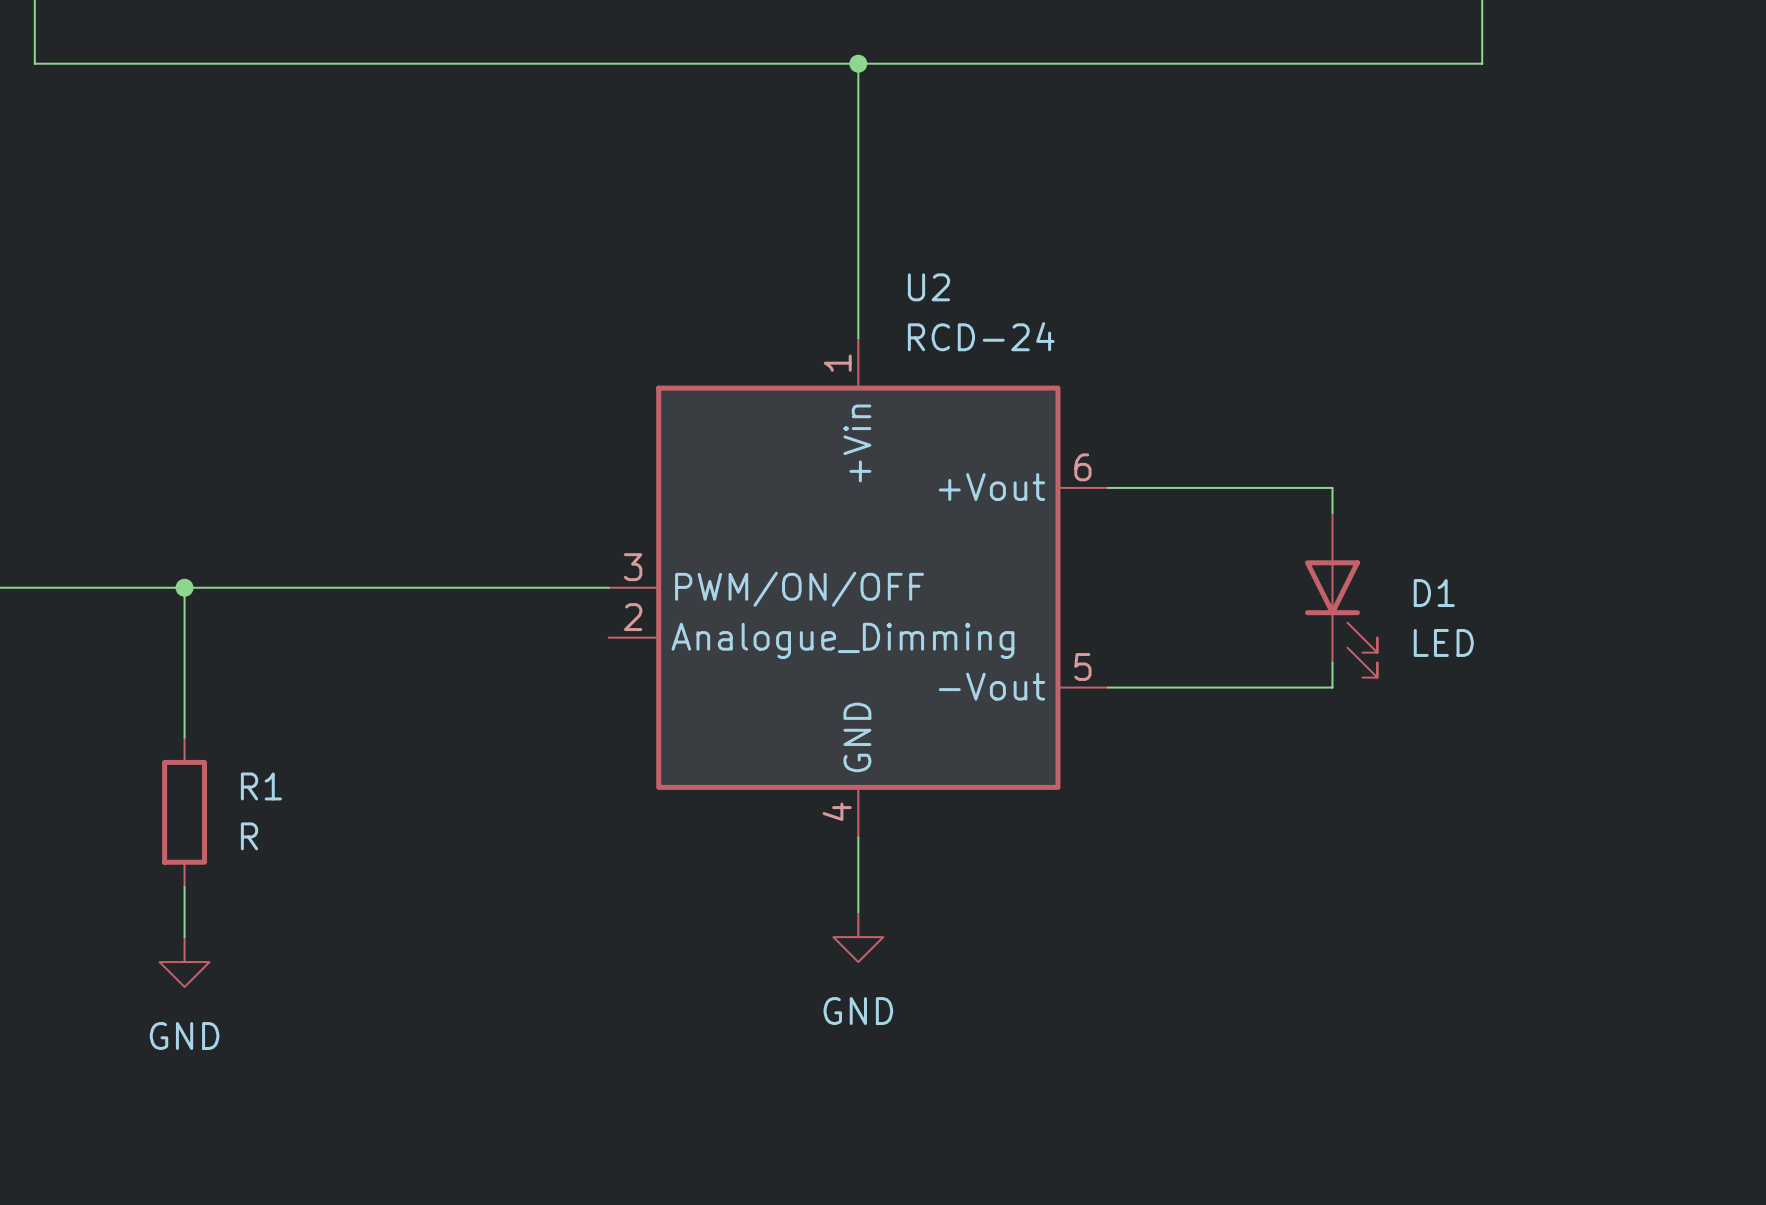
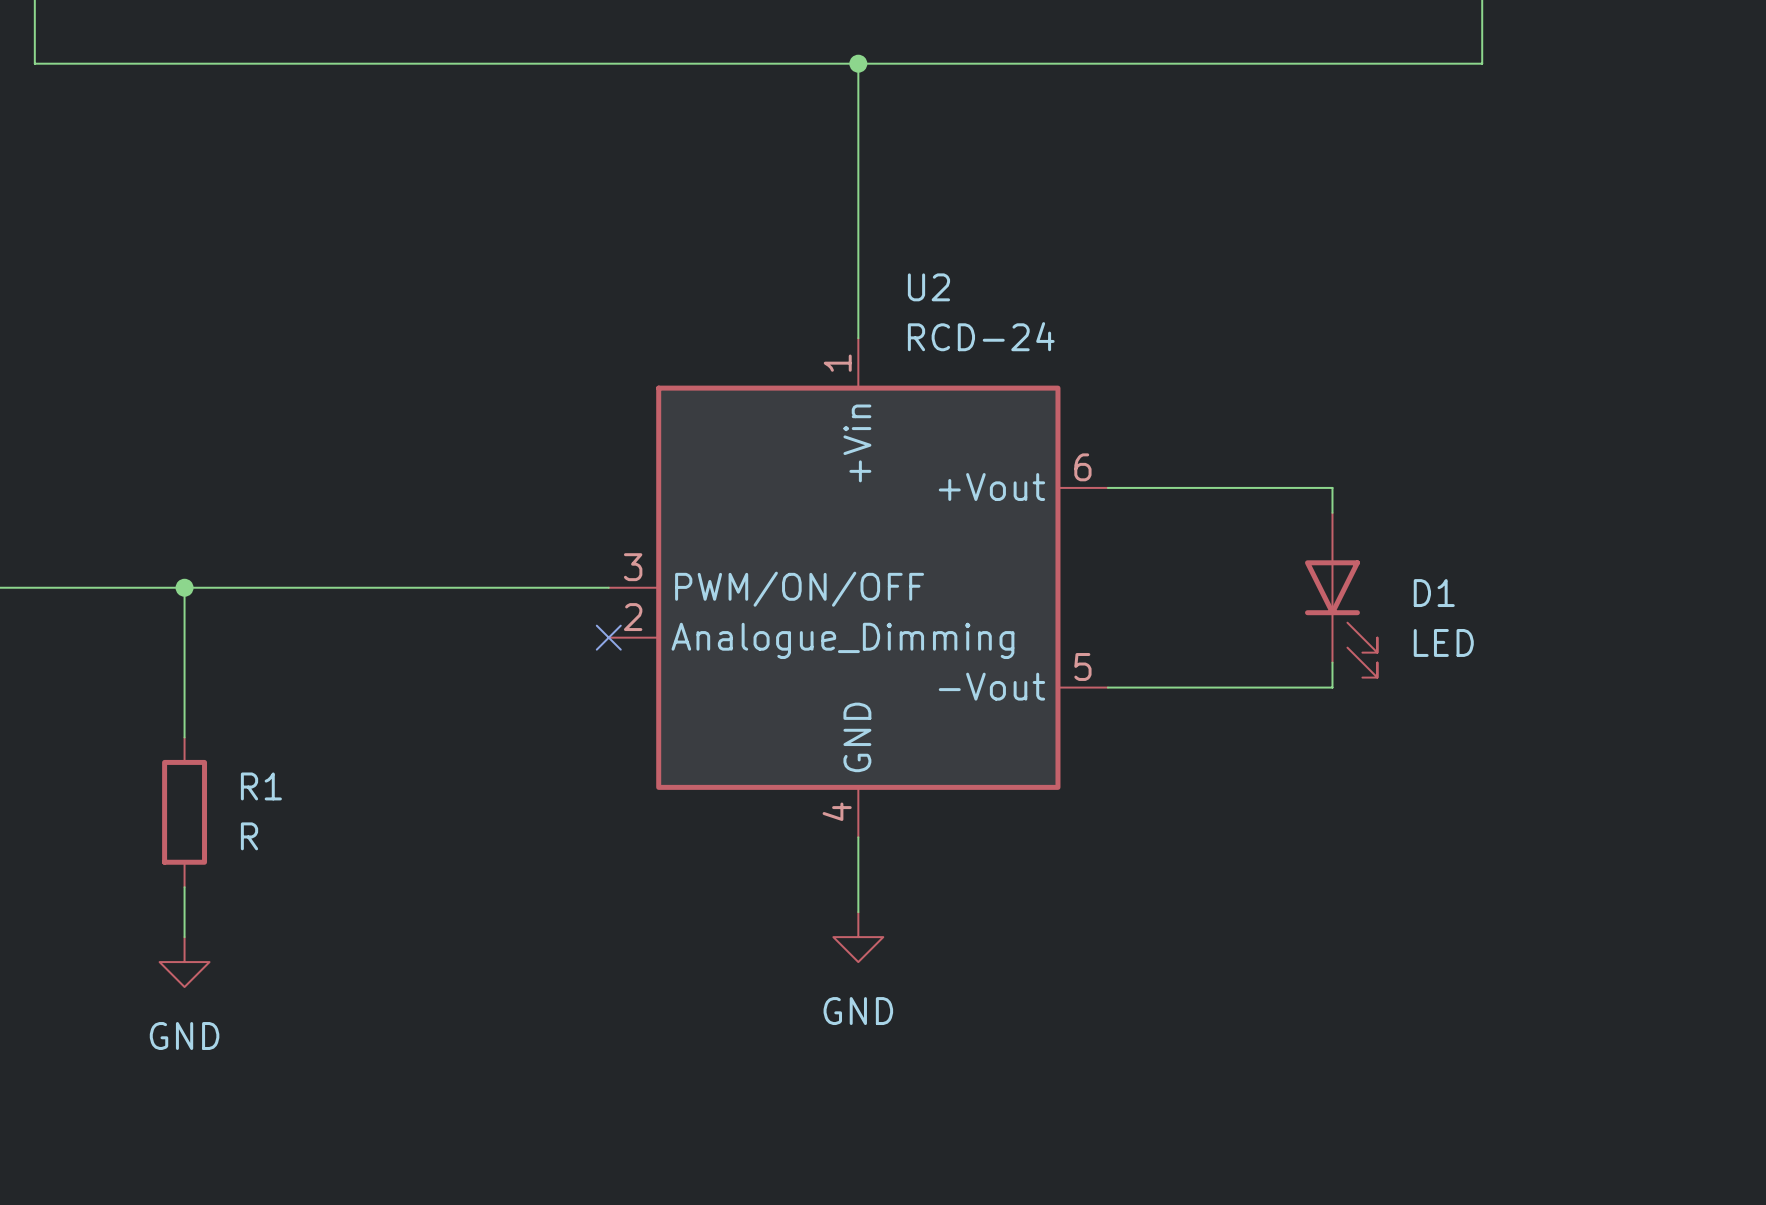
no-connect mark: none -> (608, 637)

